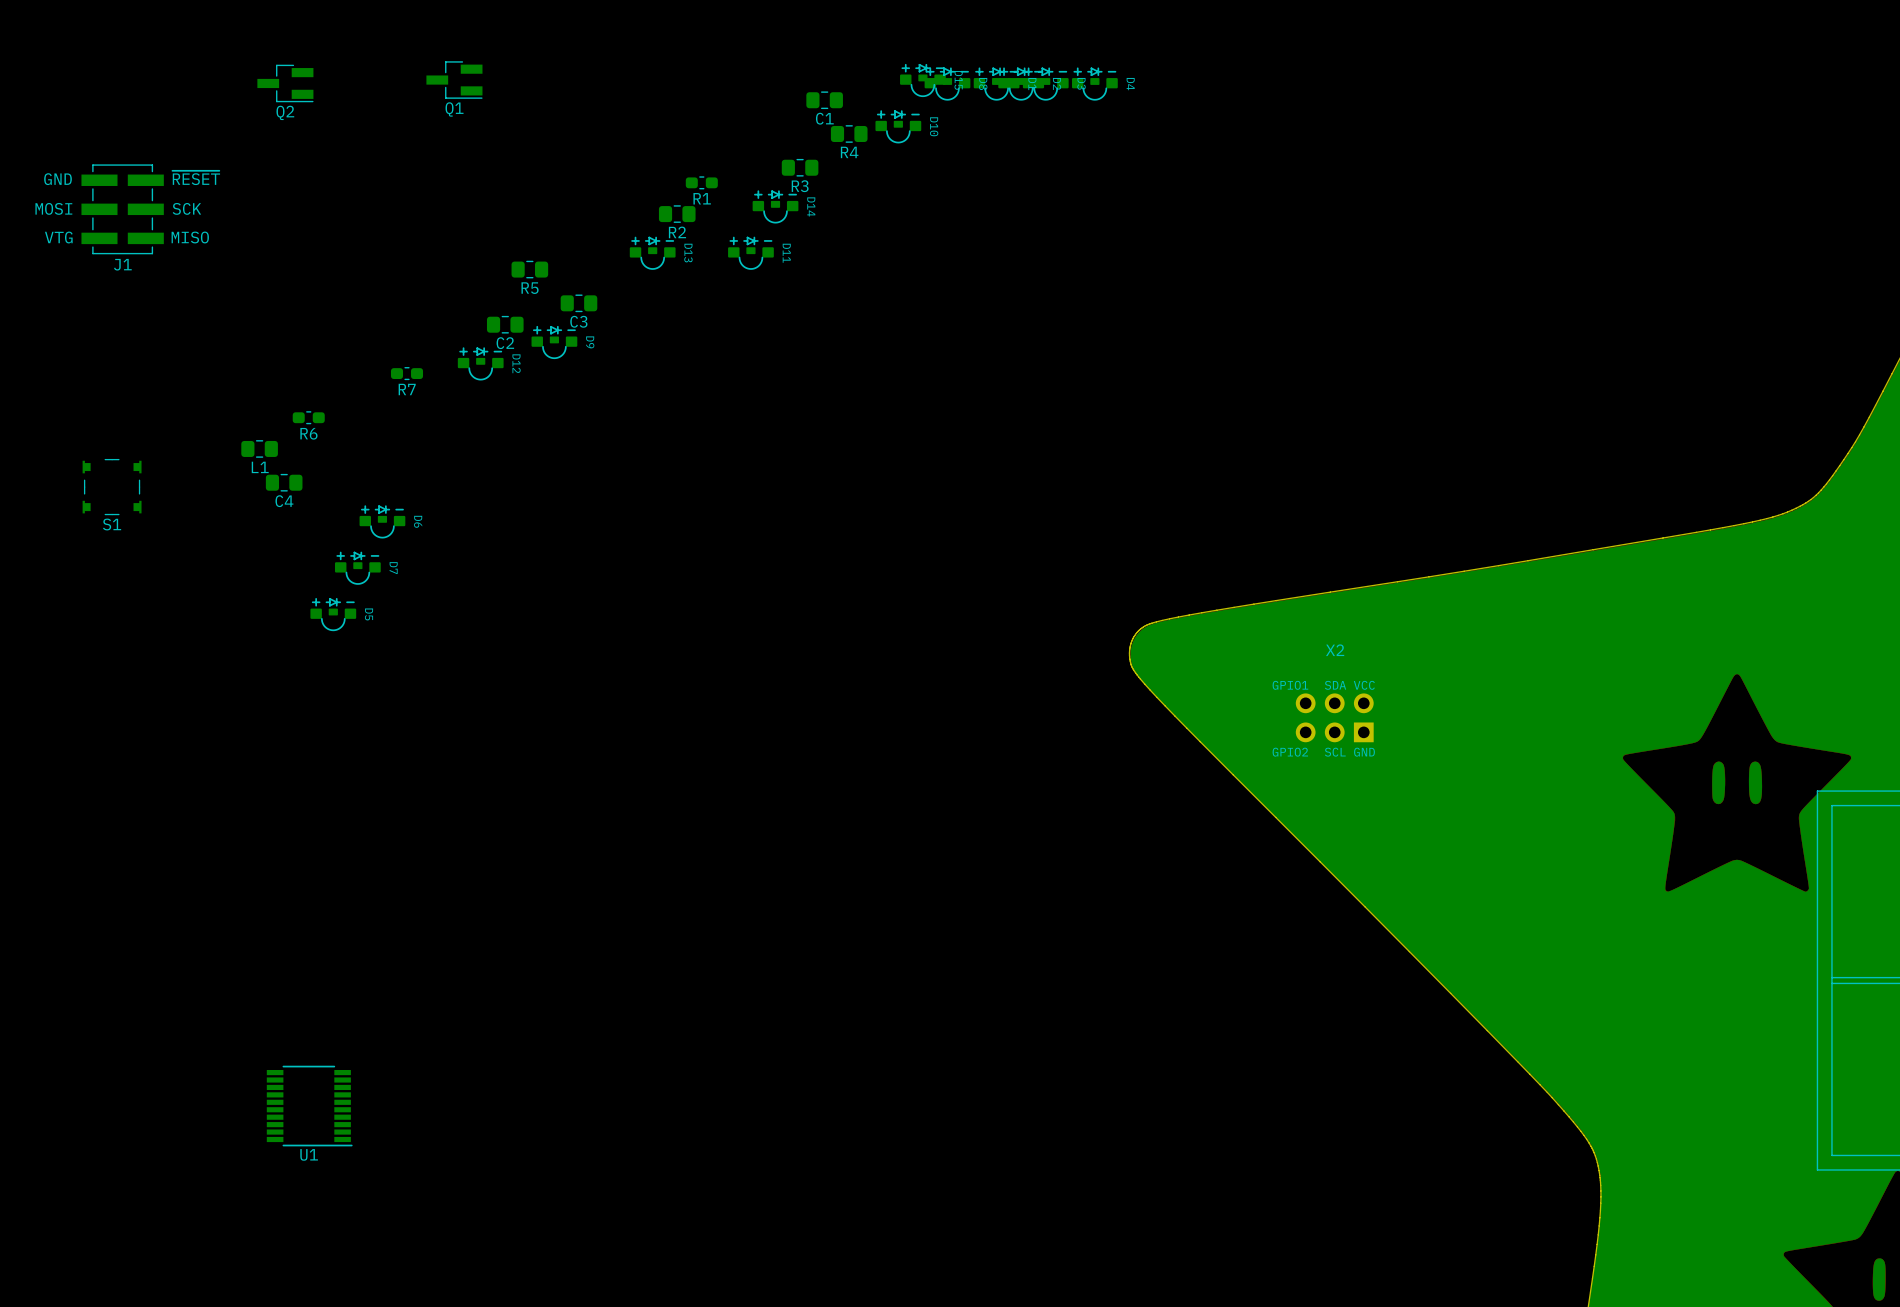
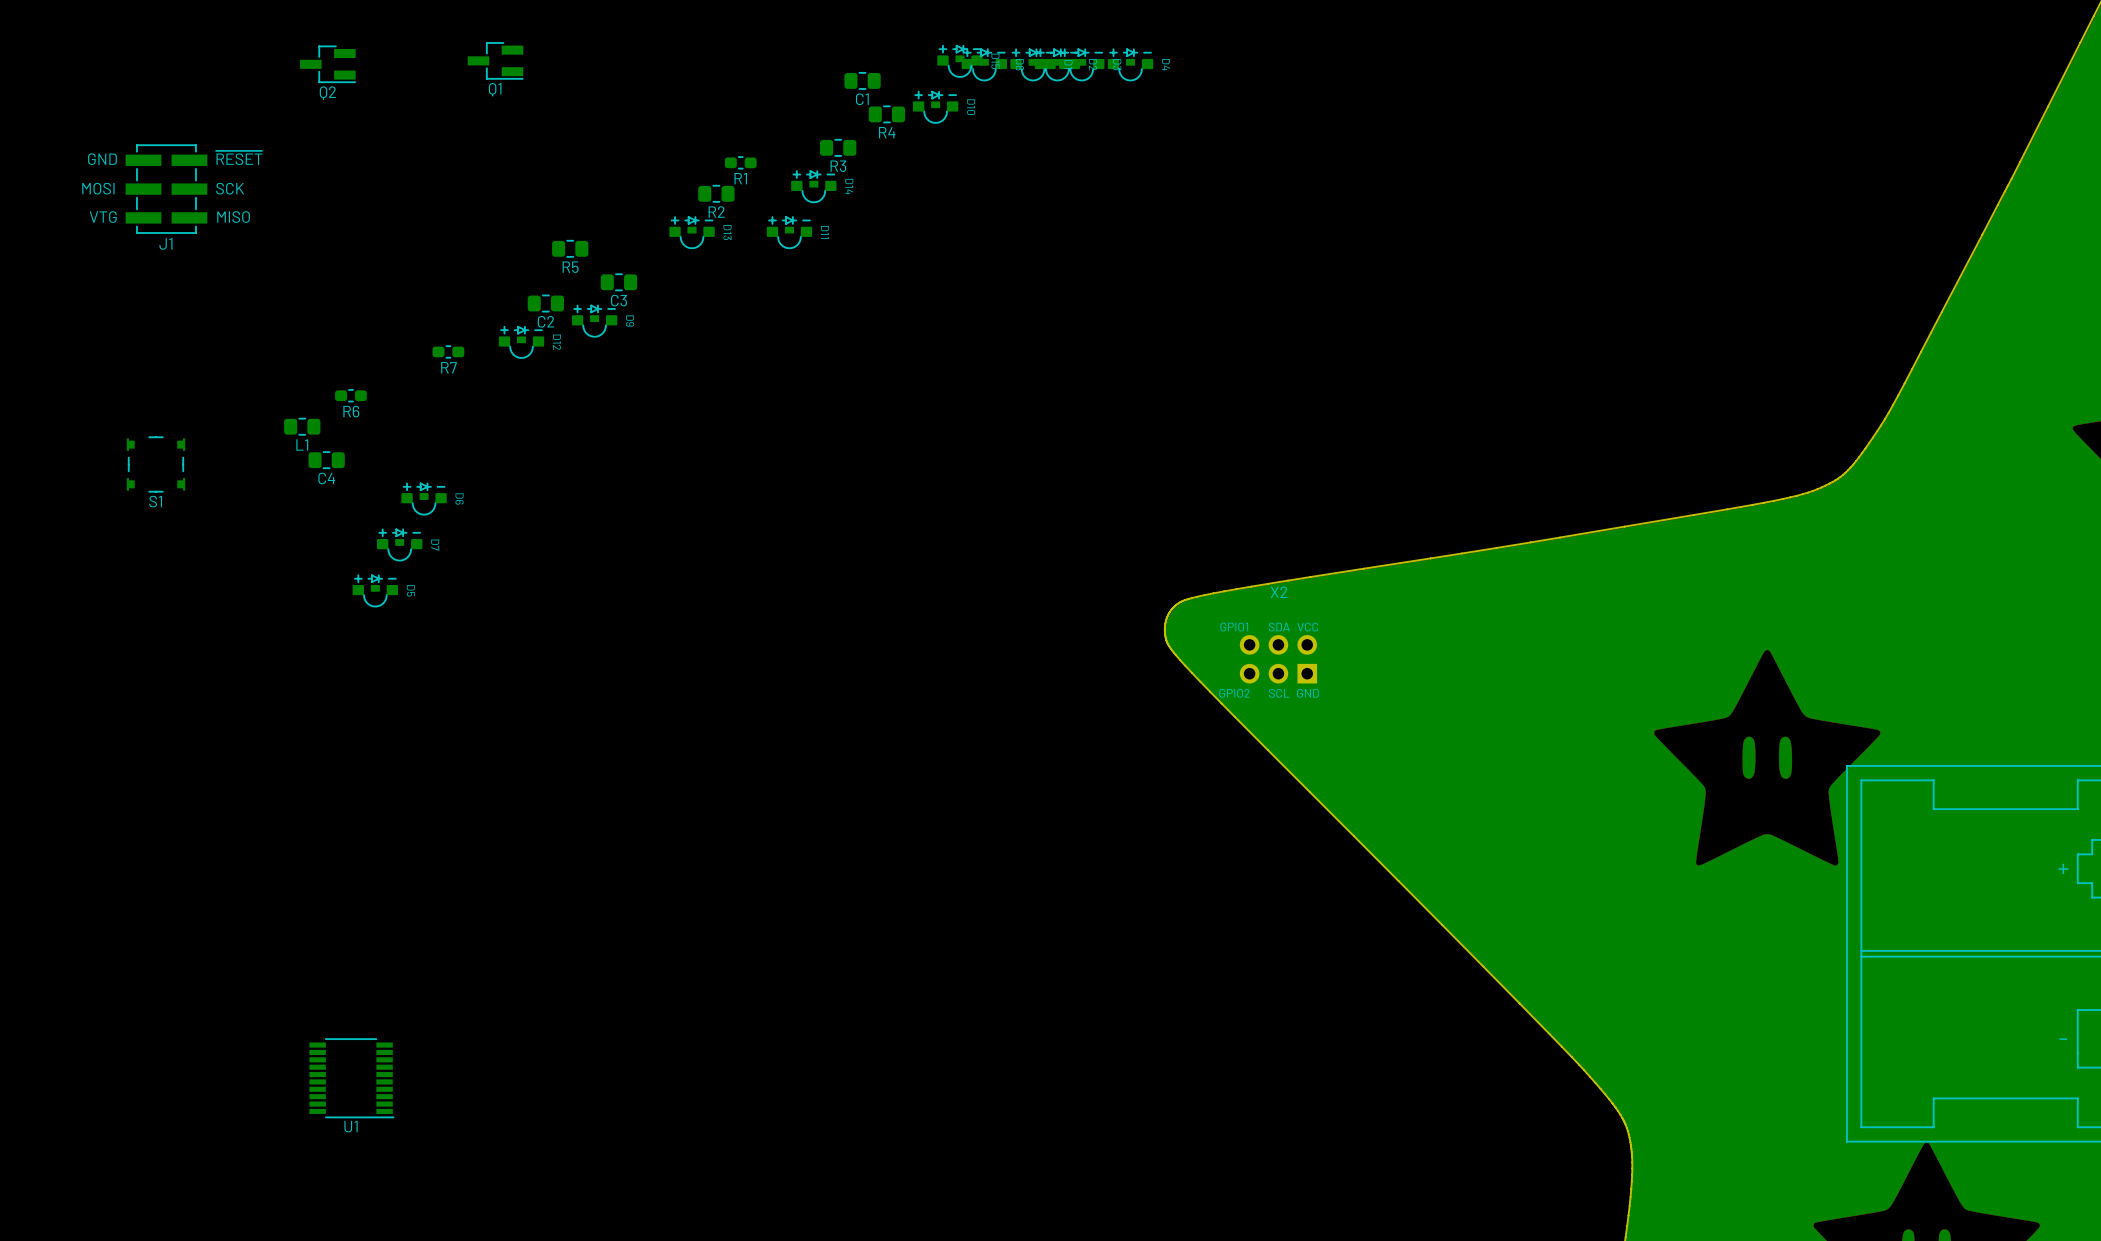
X2 position: (1334, 717) -> (1278, 659)

